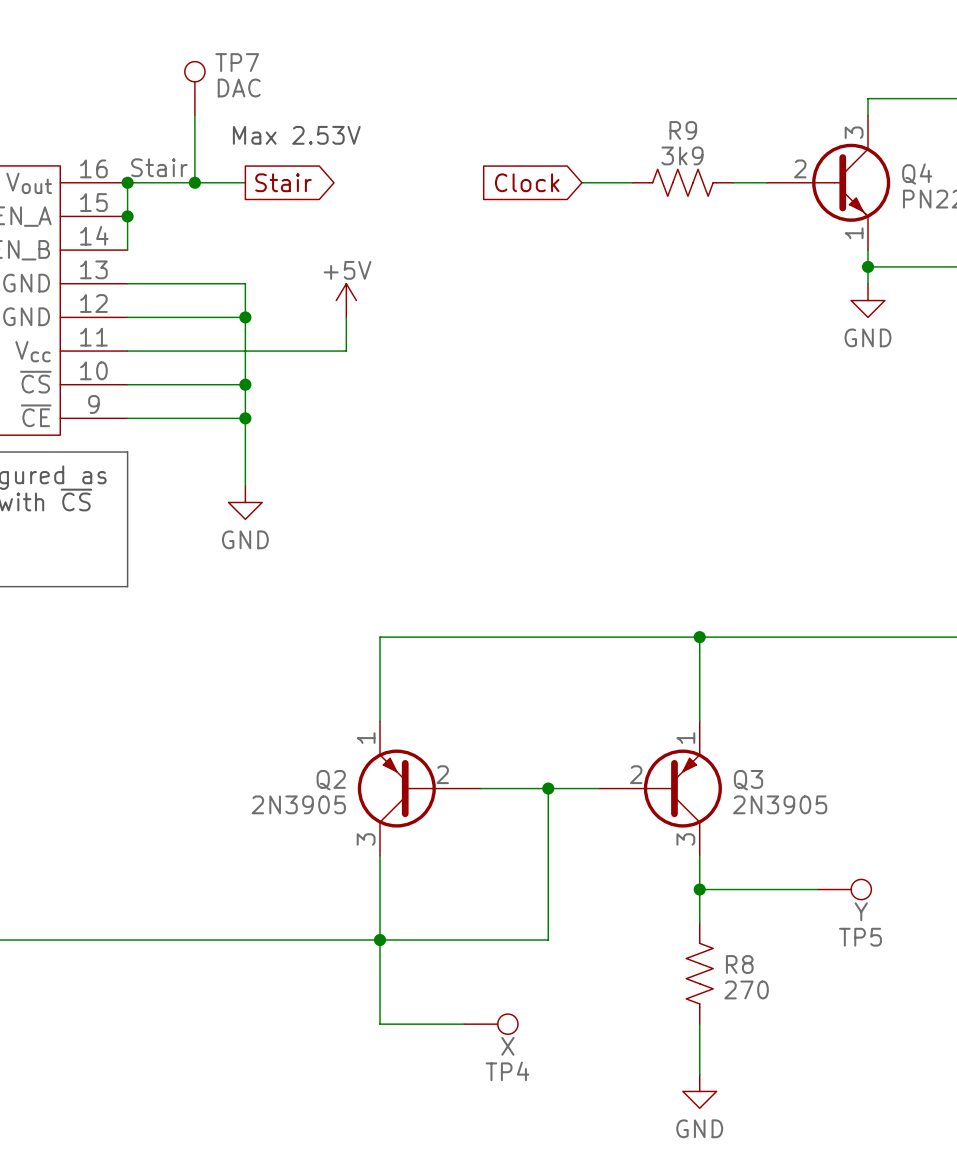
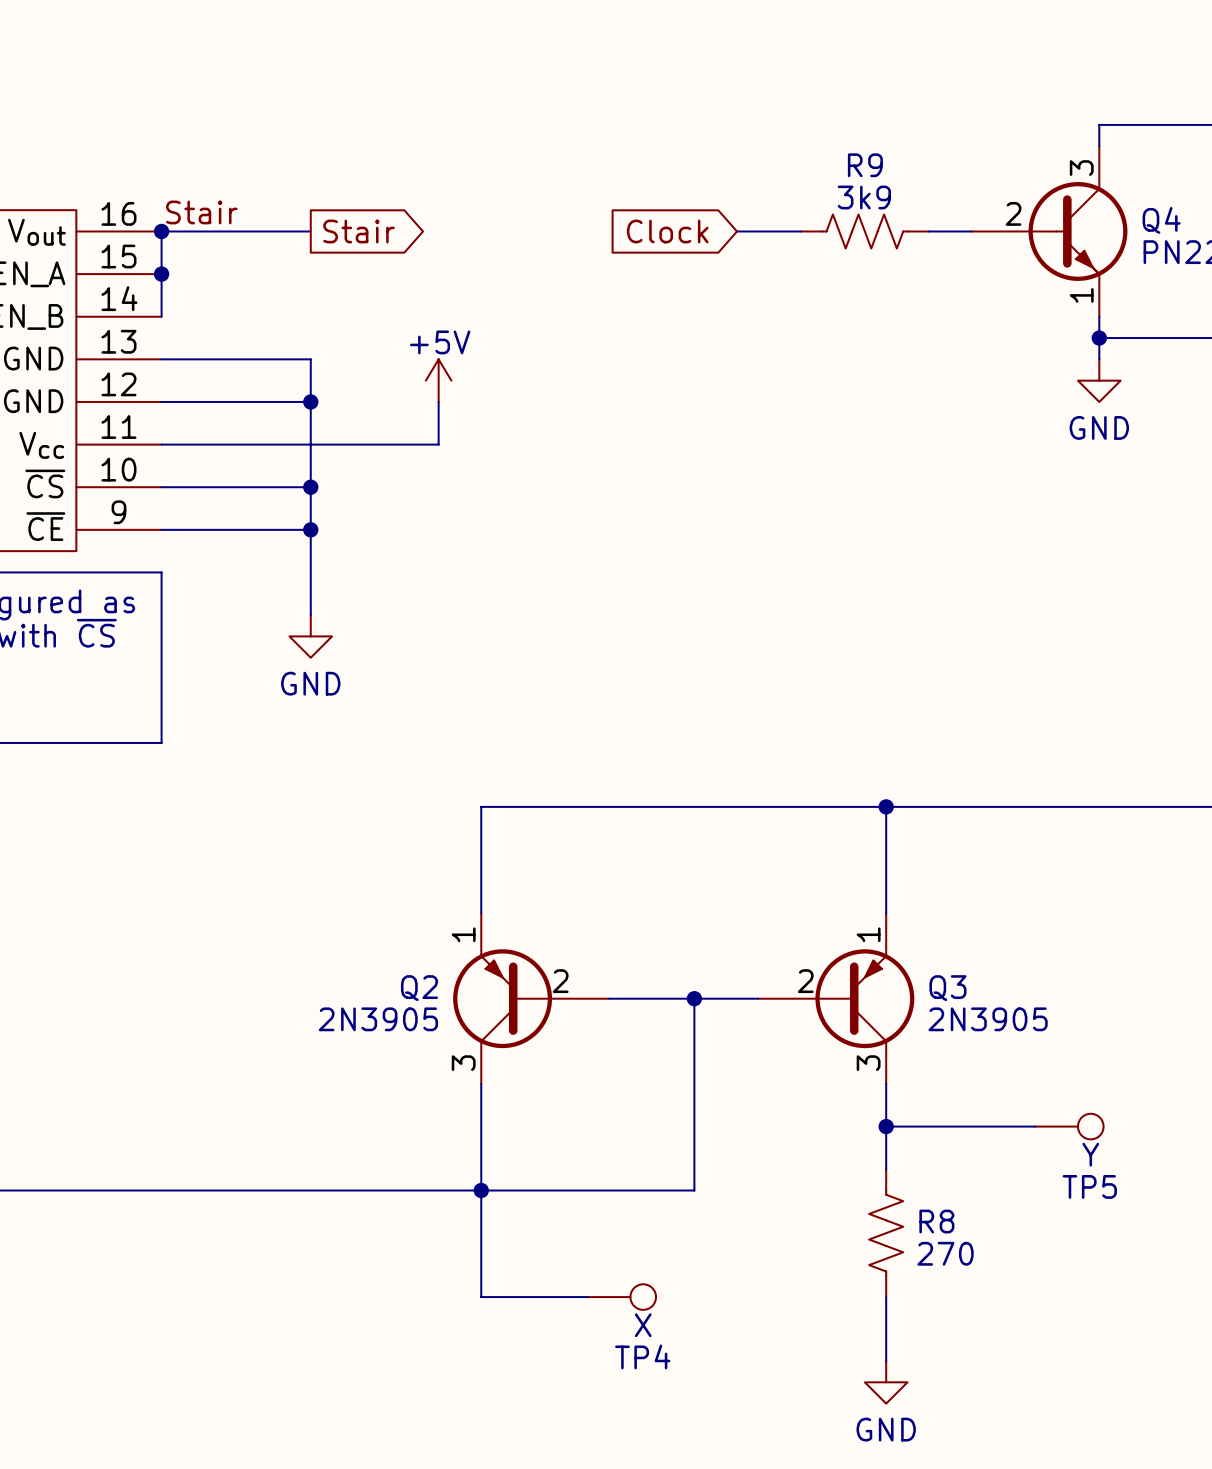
TP7: DAC (194, 88) -> none
wire: (194, 115) (194, 182) -> none
text: Max 2.53V (296, 135) -> none
junction: (194, 182) -> none

